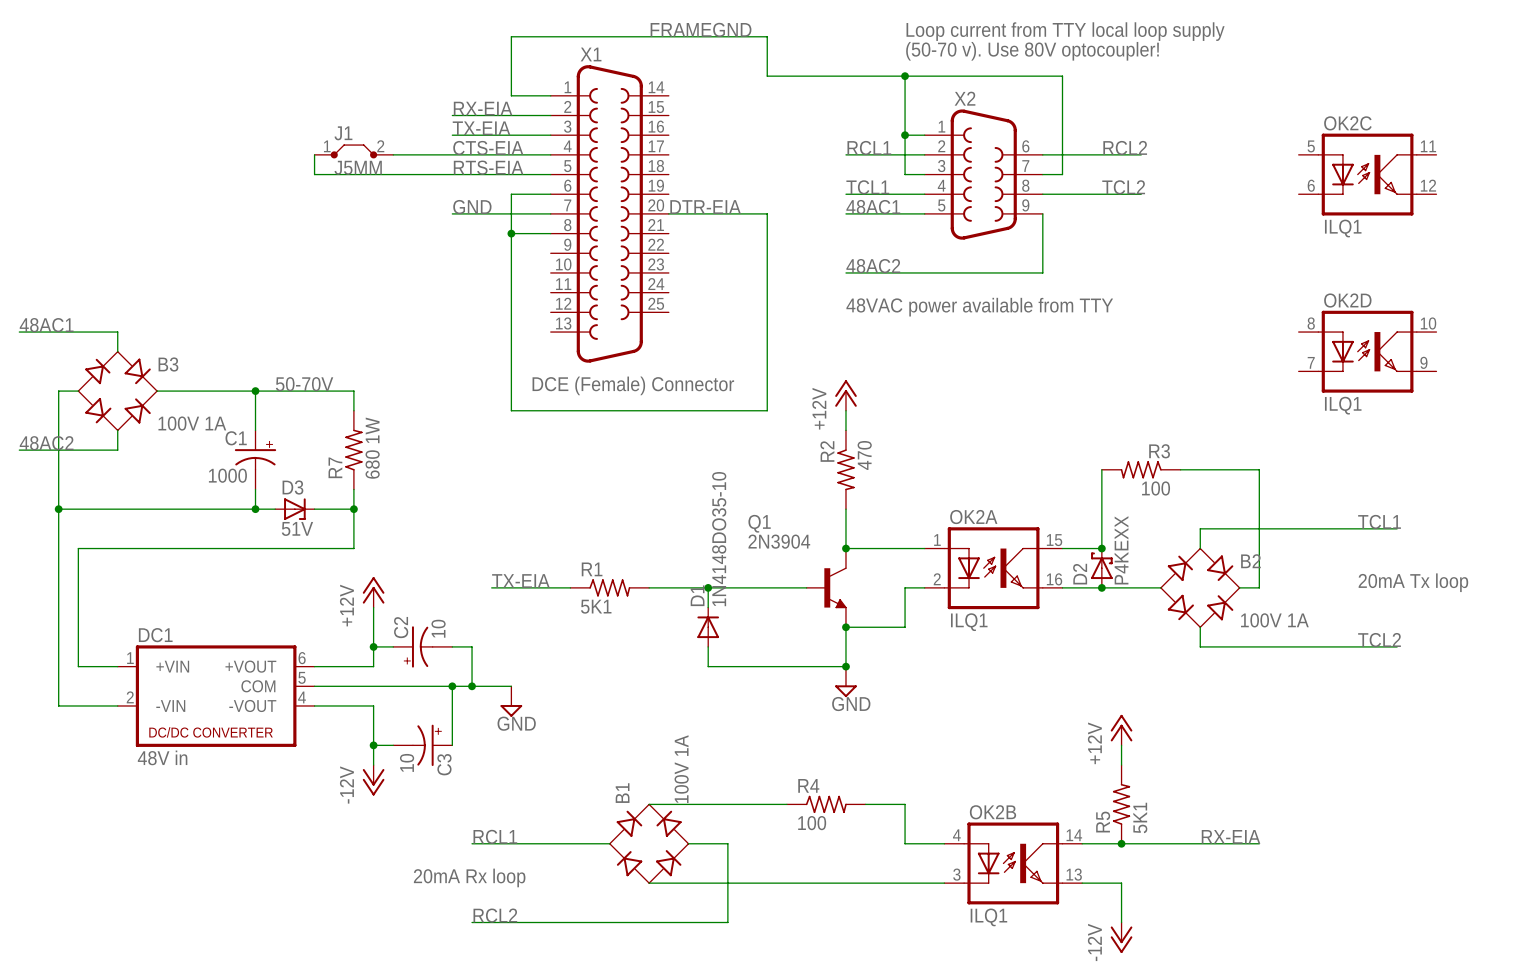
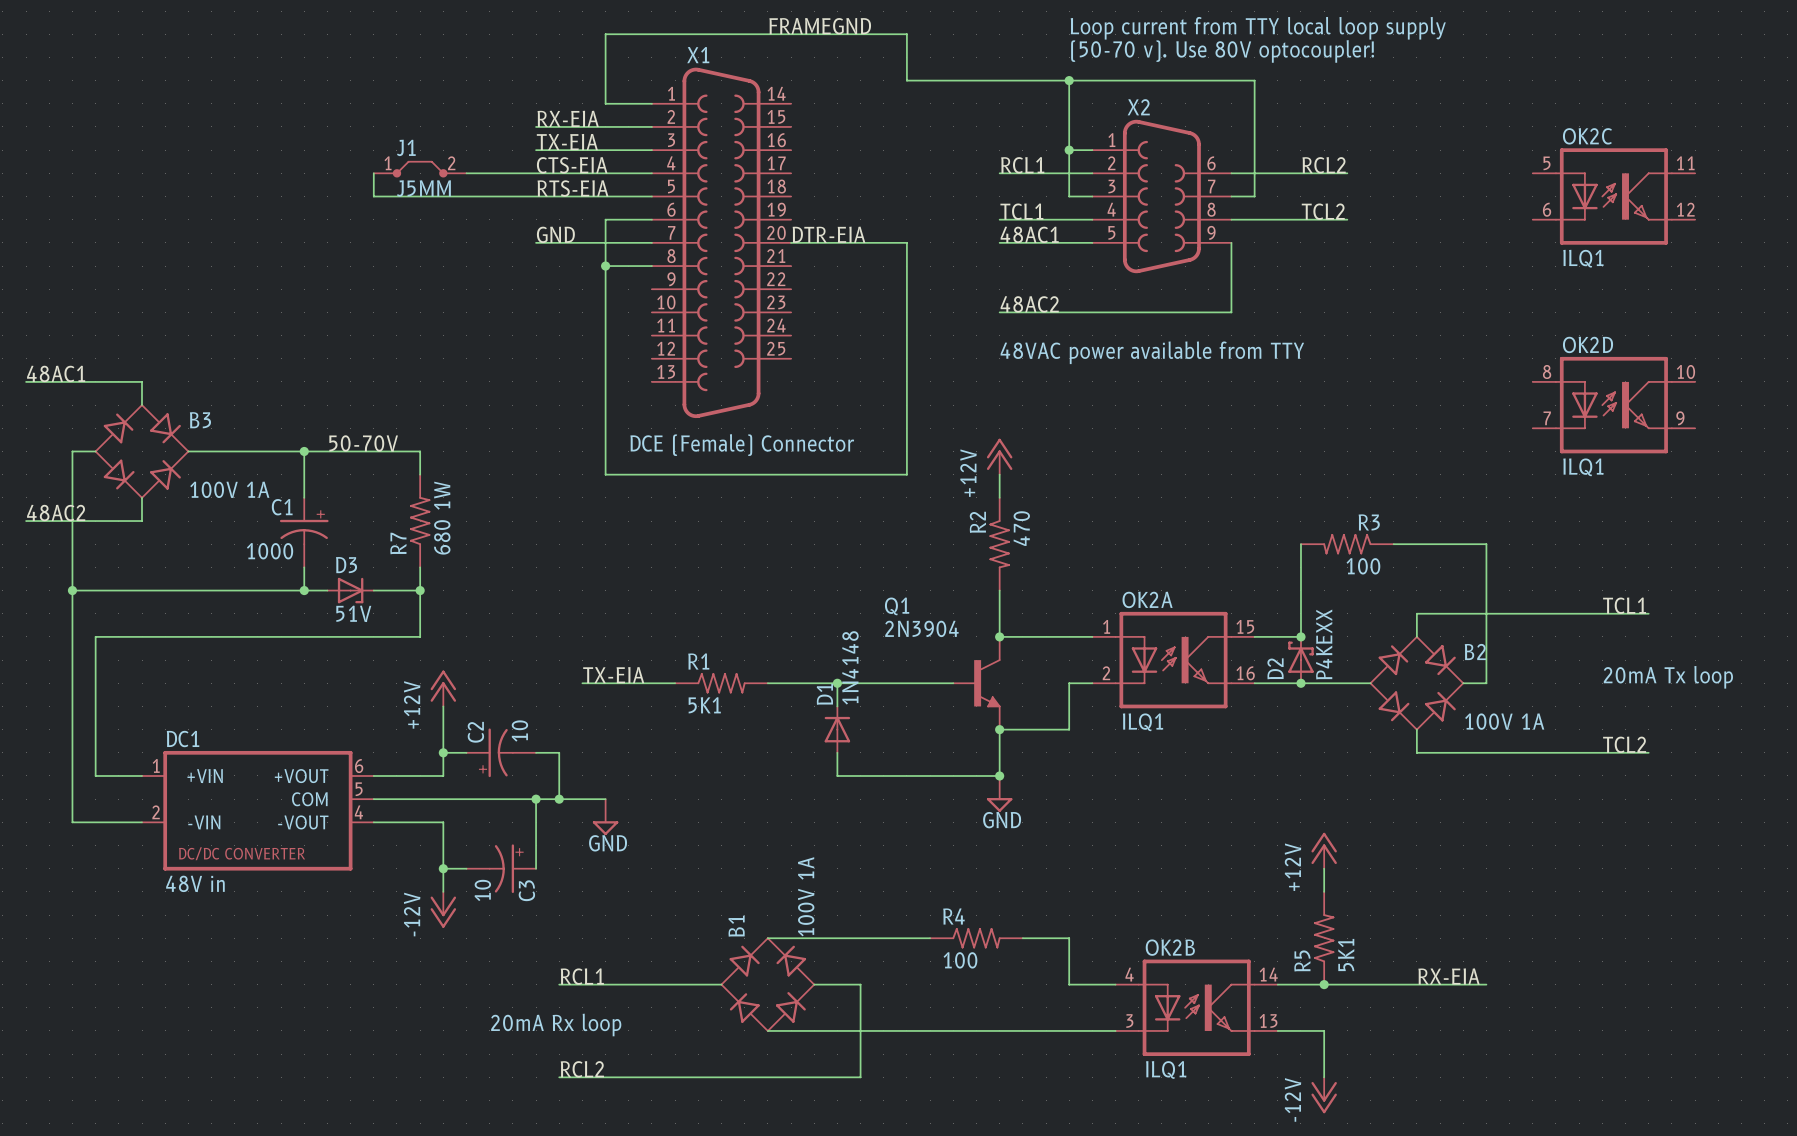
D1 value: 1N4148DO35-10 (719, 539) -> 1N4148 (850, 667)

